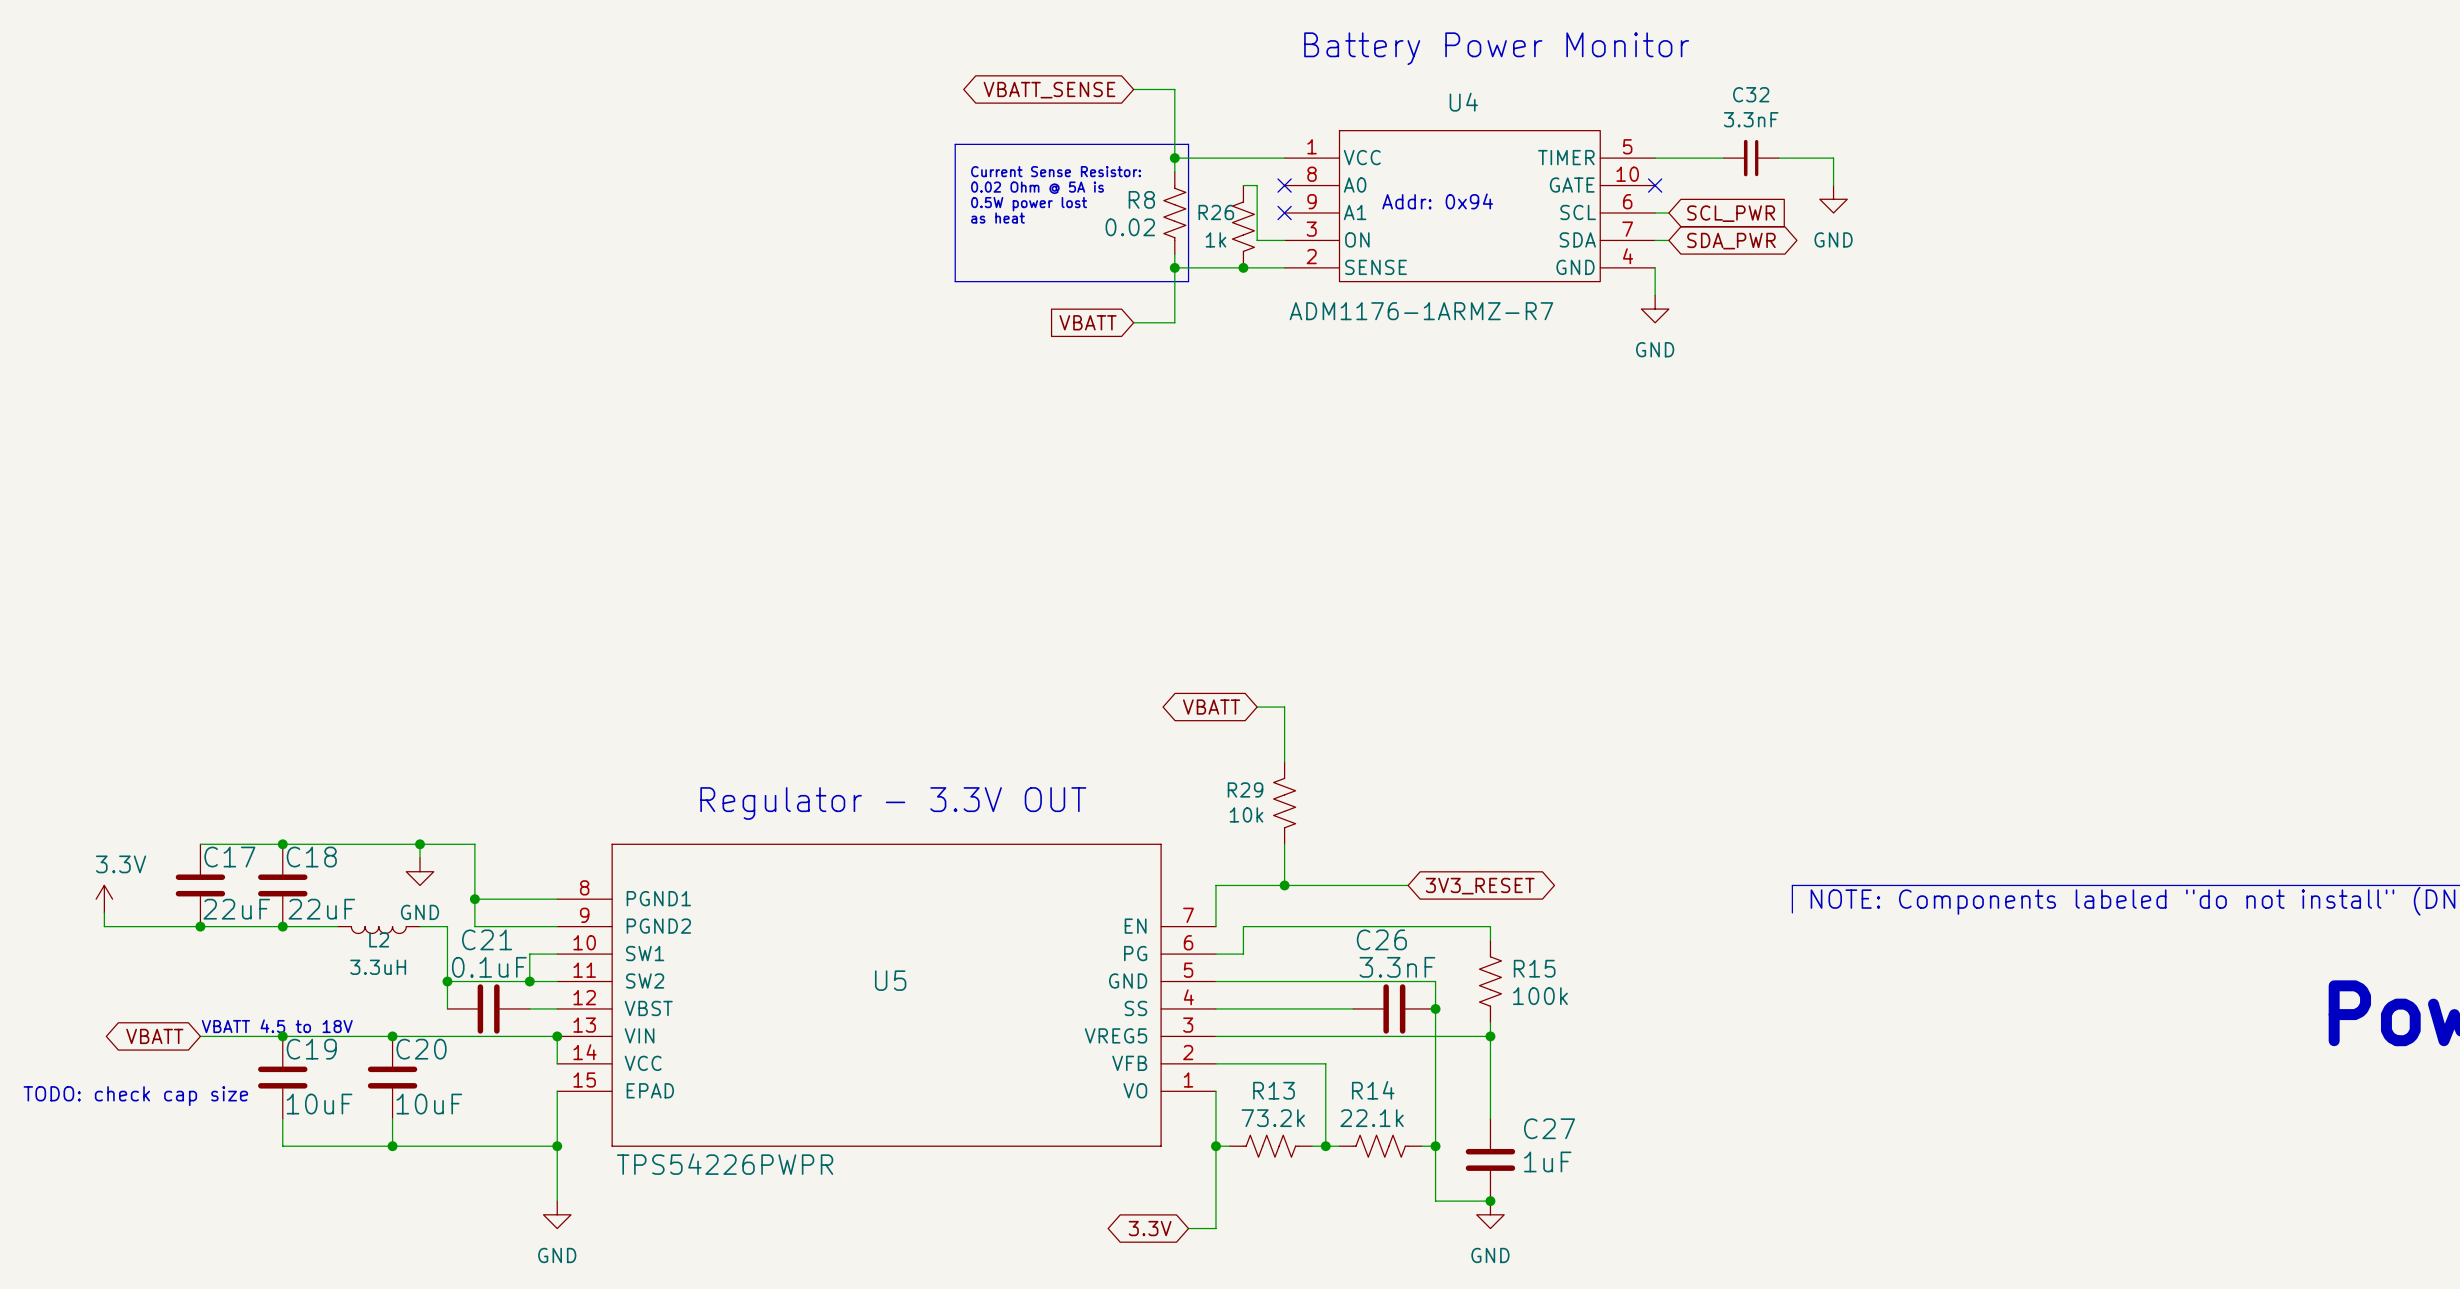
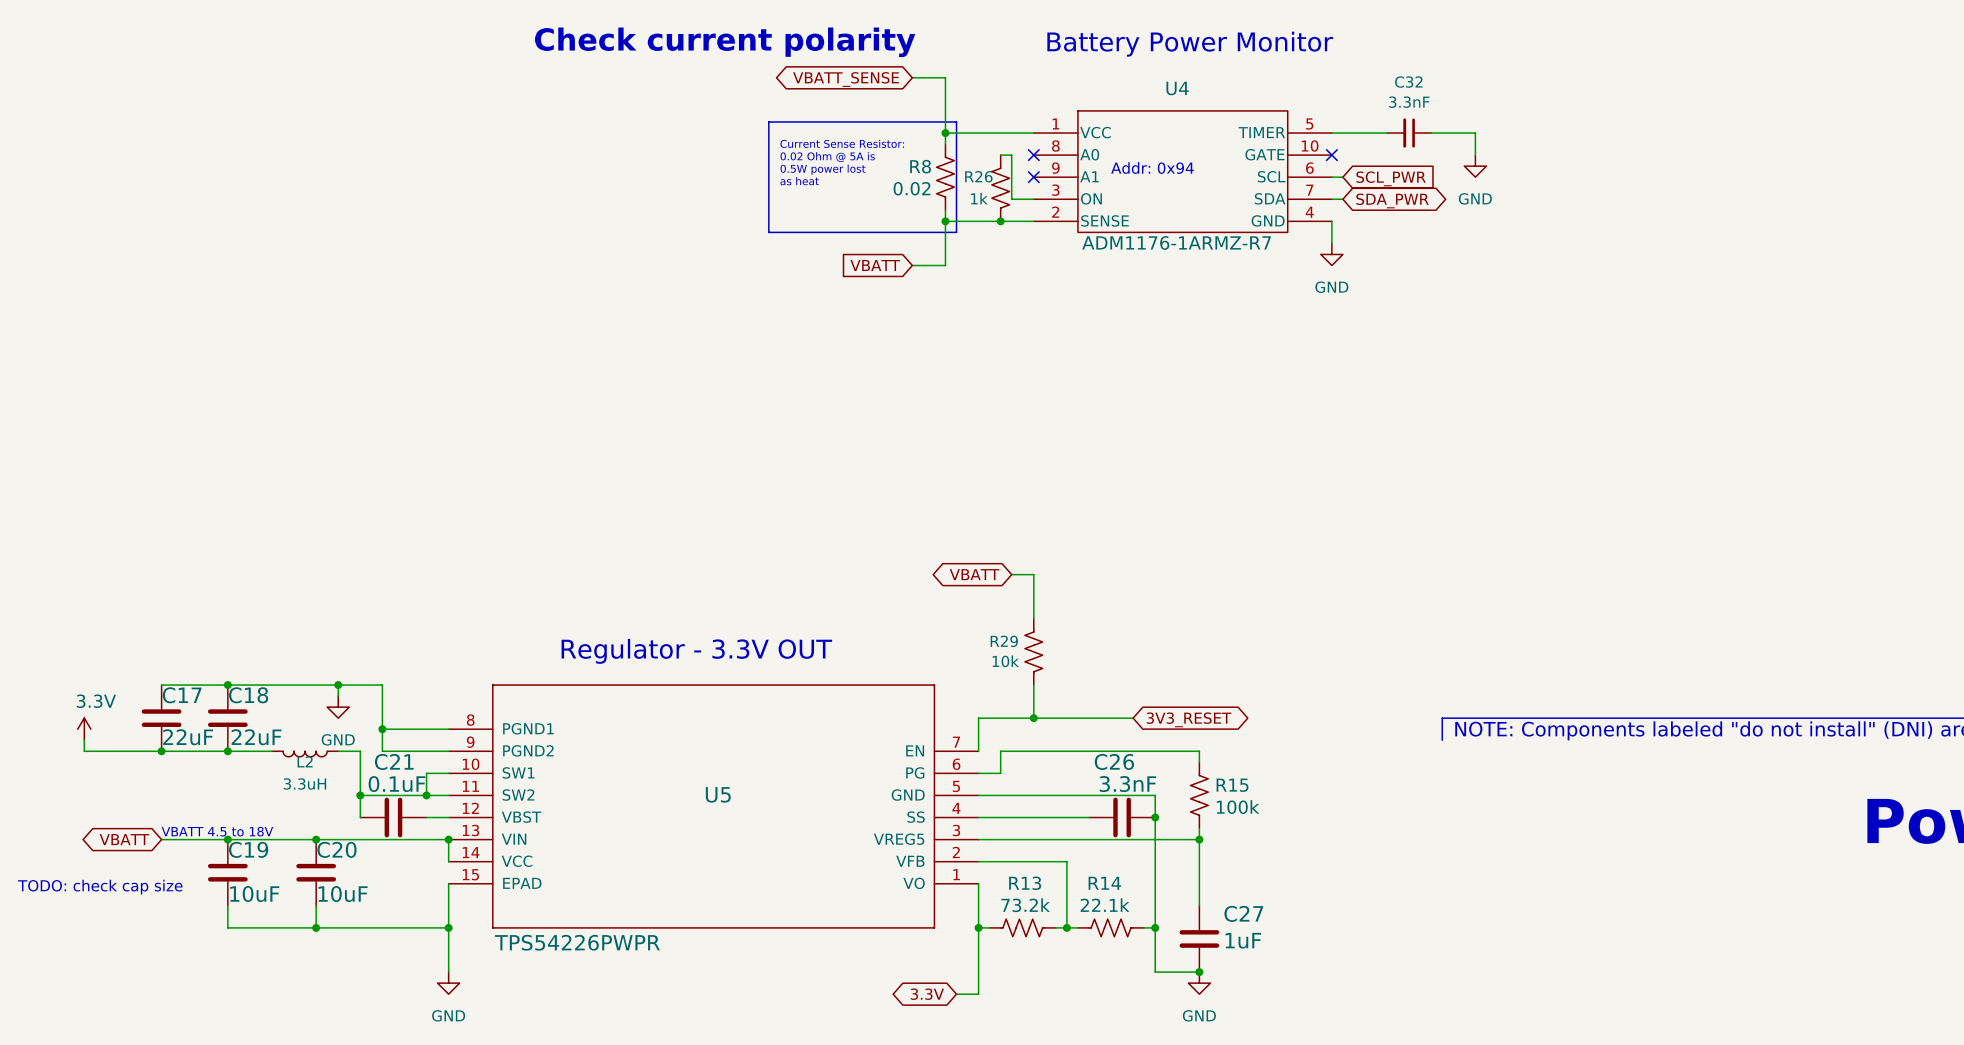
text: none -> Check current polarity (725, 42)
U4 value position: ADM1176-1ARMZ-R7 (1421, 311) -> ADM1176-1ARMZ-R7 (1176, 242)

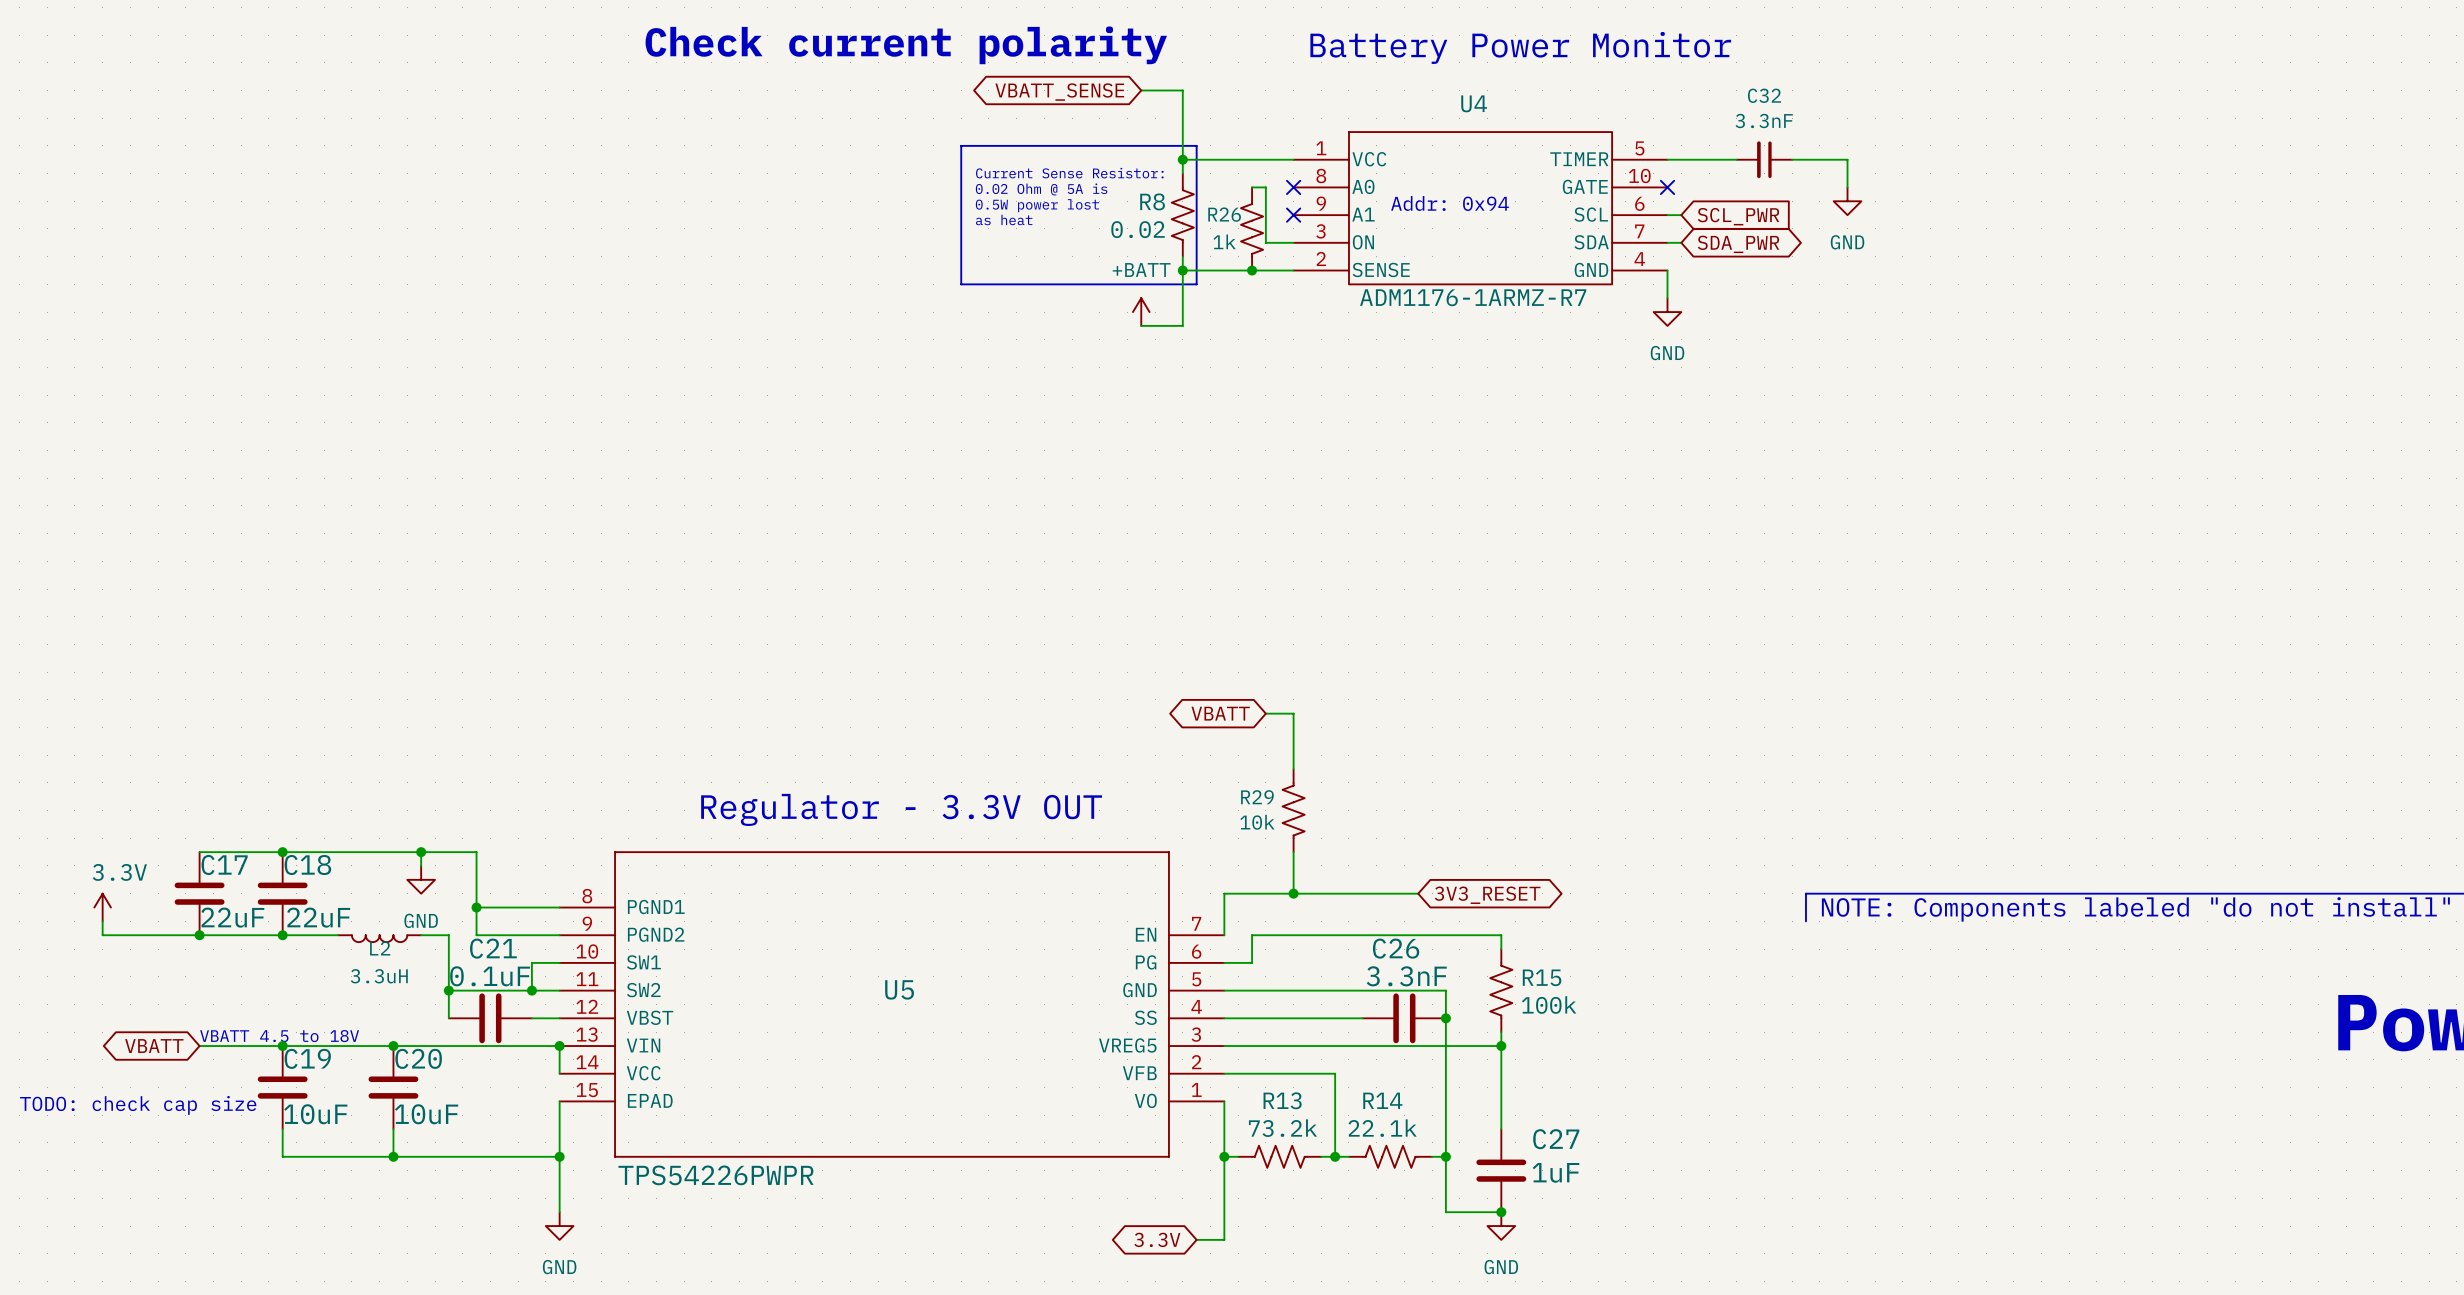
power symbol: none -> +BATT (1141, 312)
global label: VBATT (875, 265) -> none

